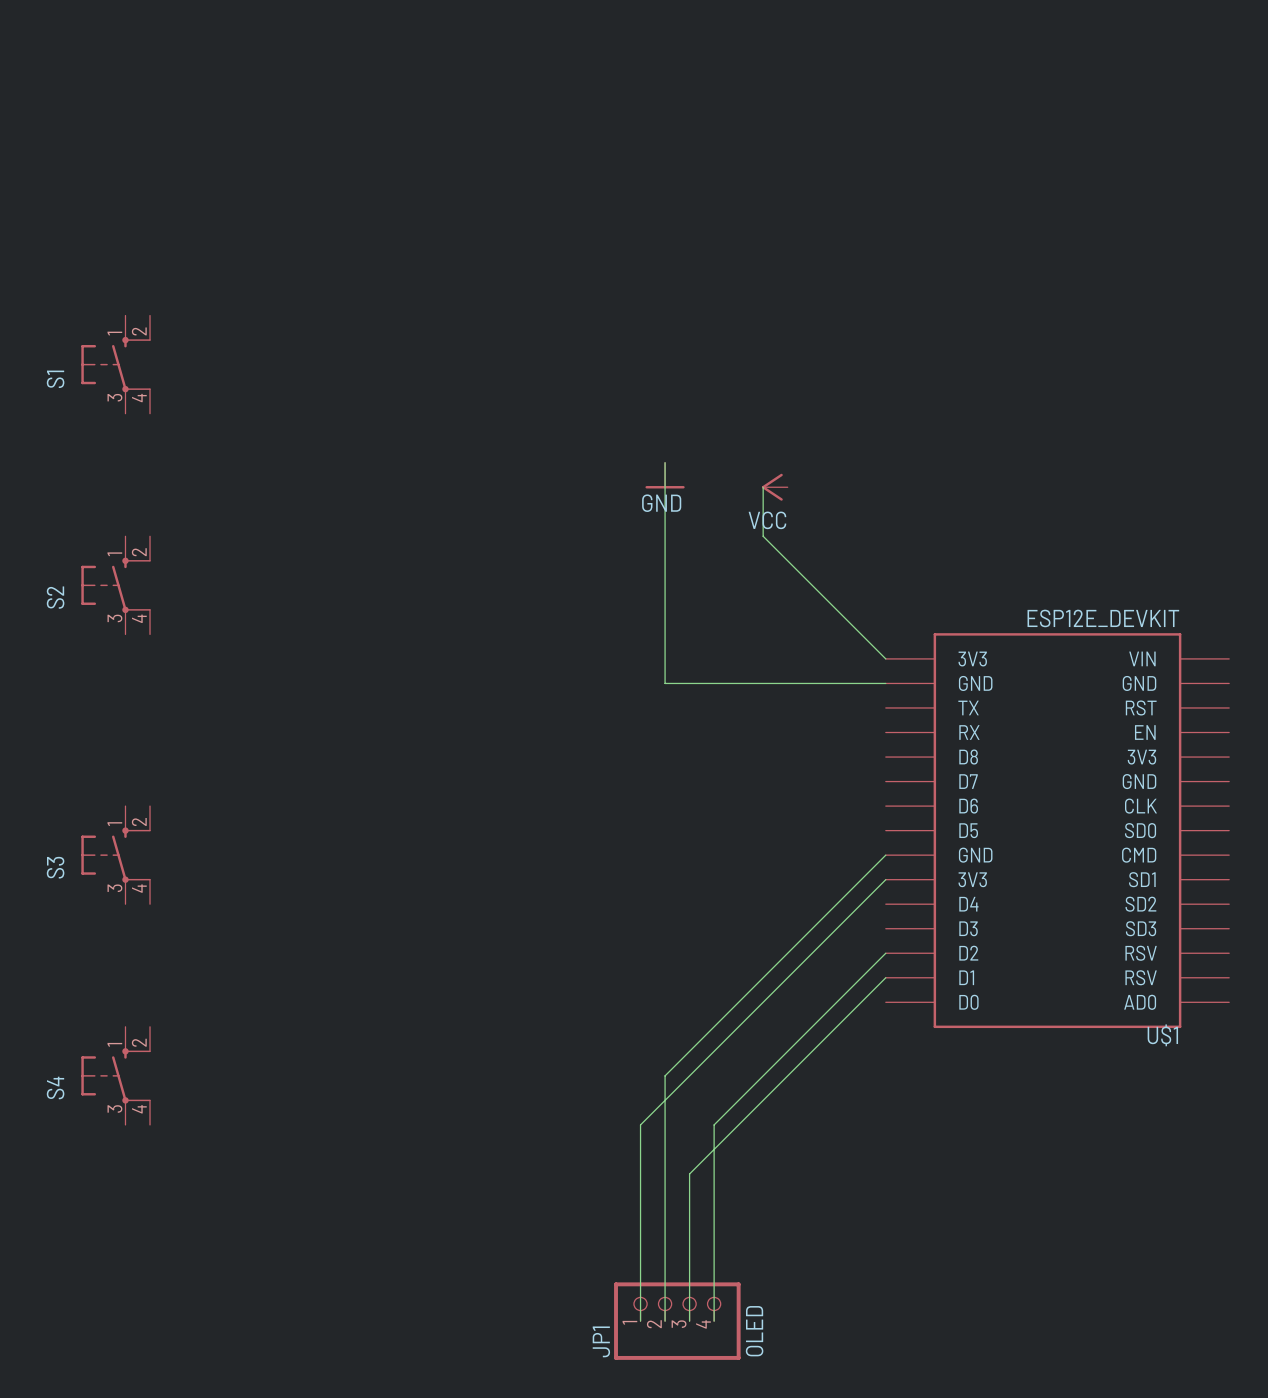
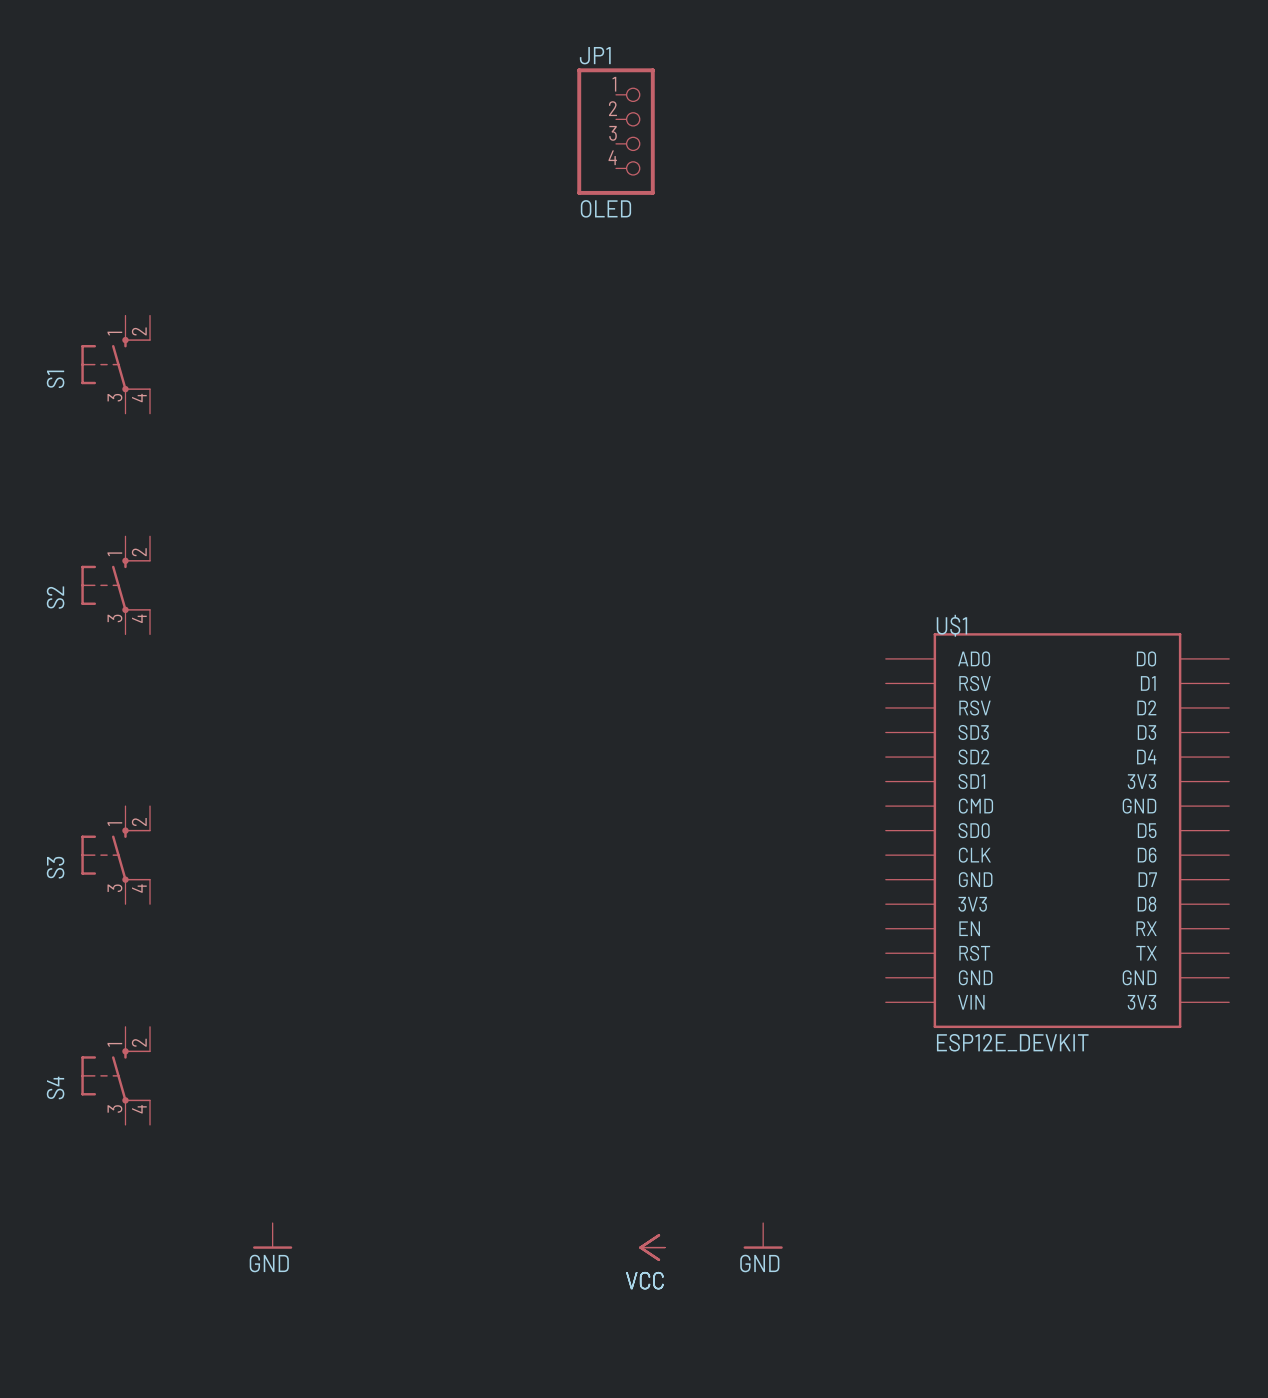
wire: (665, 462) (665, 683) (885, 683) -> none
power symbol: GND (665, 475) -> none
wire: (763, 487) (763, 536) (885, 658) -> none
power symbol: VCC (774, 487) -> none
U$1 rotation: 0° (1057, 830) -> 180° (1057, 830)
wire: (885, 855) (665, 1075) (665, 1321) -> none
wire: (885, 879) (640, 1124) (640, 1321) -> none
wire: (885, 953) (714, 1124) (714, 1321) -> none
wire: (885, 977) (689, 1173) (689, 1321) -> none
power symbol: none -> GND (272, 1235)
power symbol: none -> GND (763, 1235)
power symbol: none -> VCC (652, 1247)
JP1 rotation: 0° (677, 1321) -> 90° clockwise (616, 131)
JP1 position: (677, 1321) -> (616, 131)

